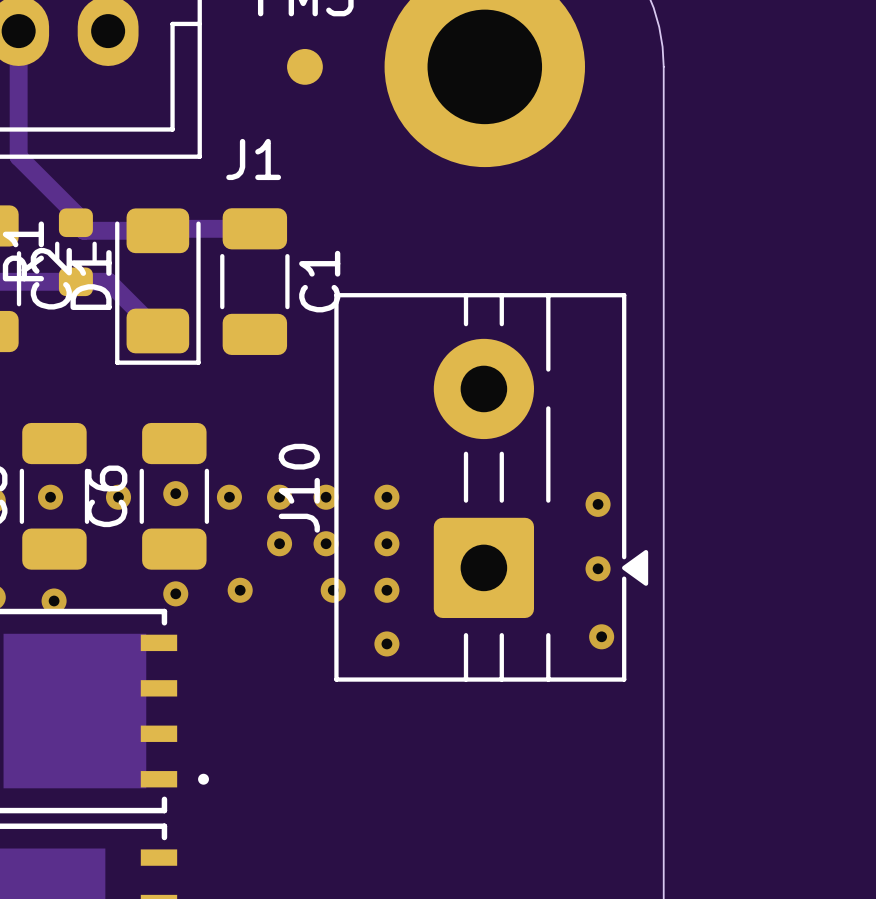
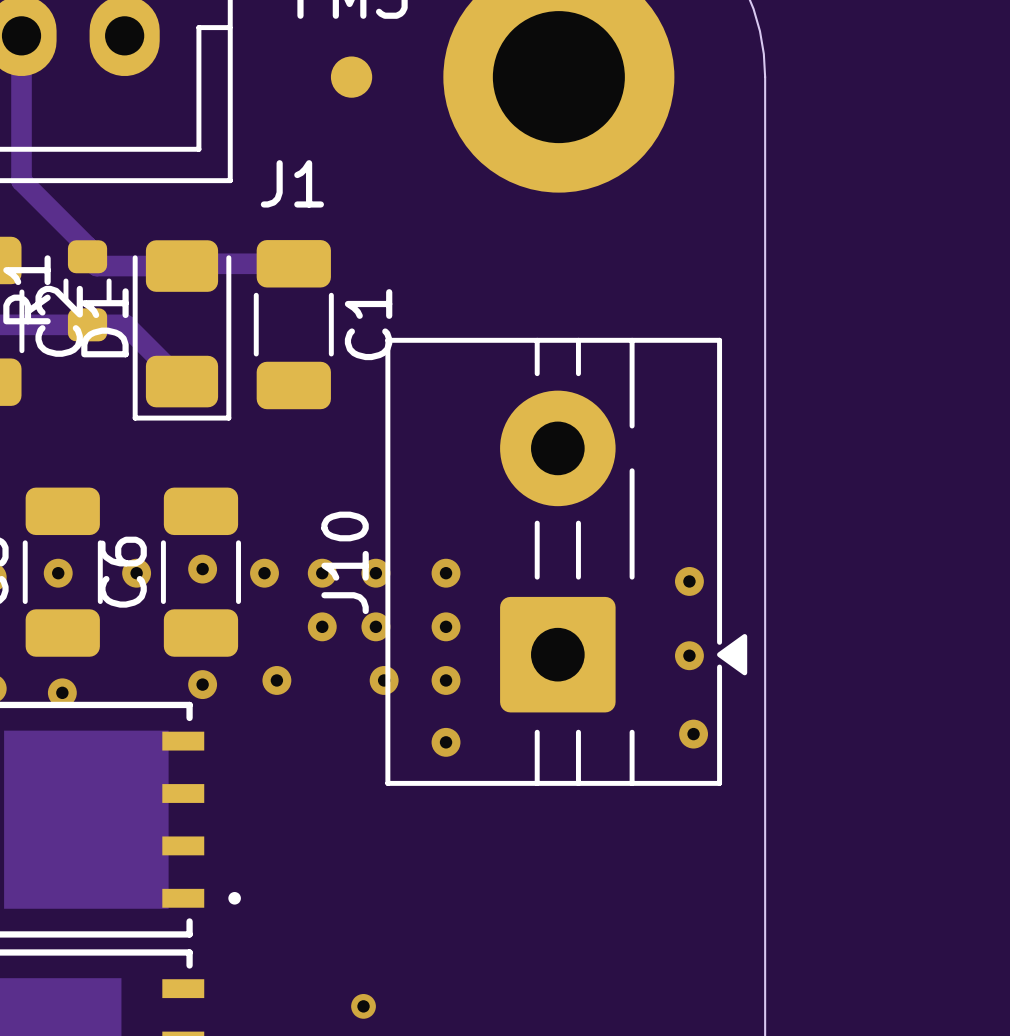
via: none -> (363, 1006)

